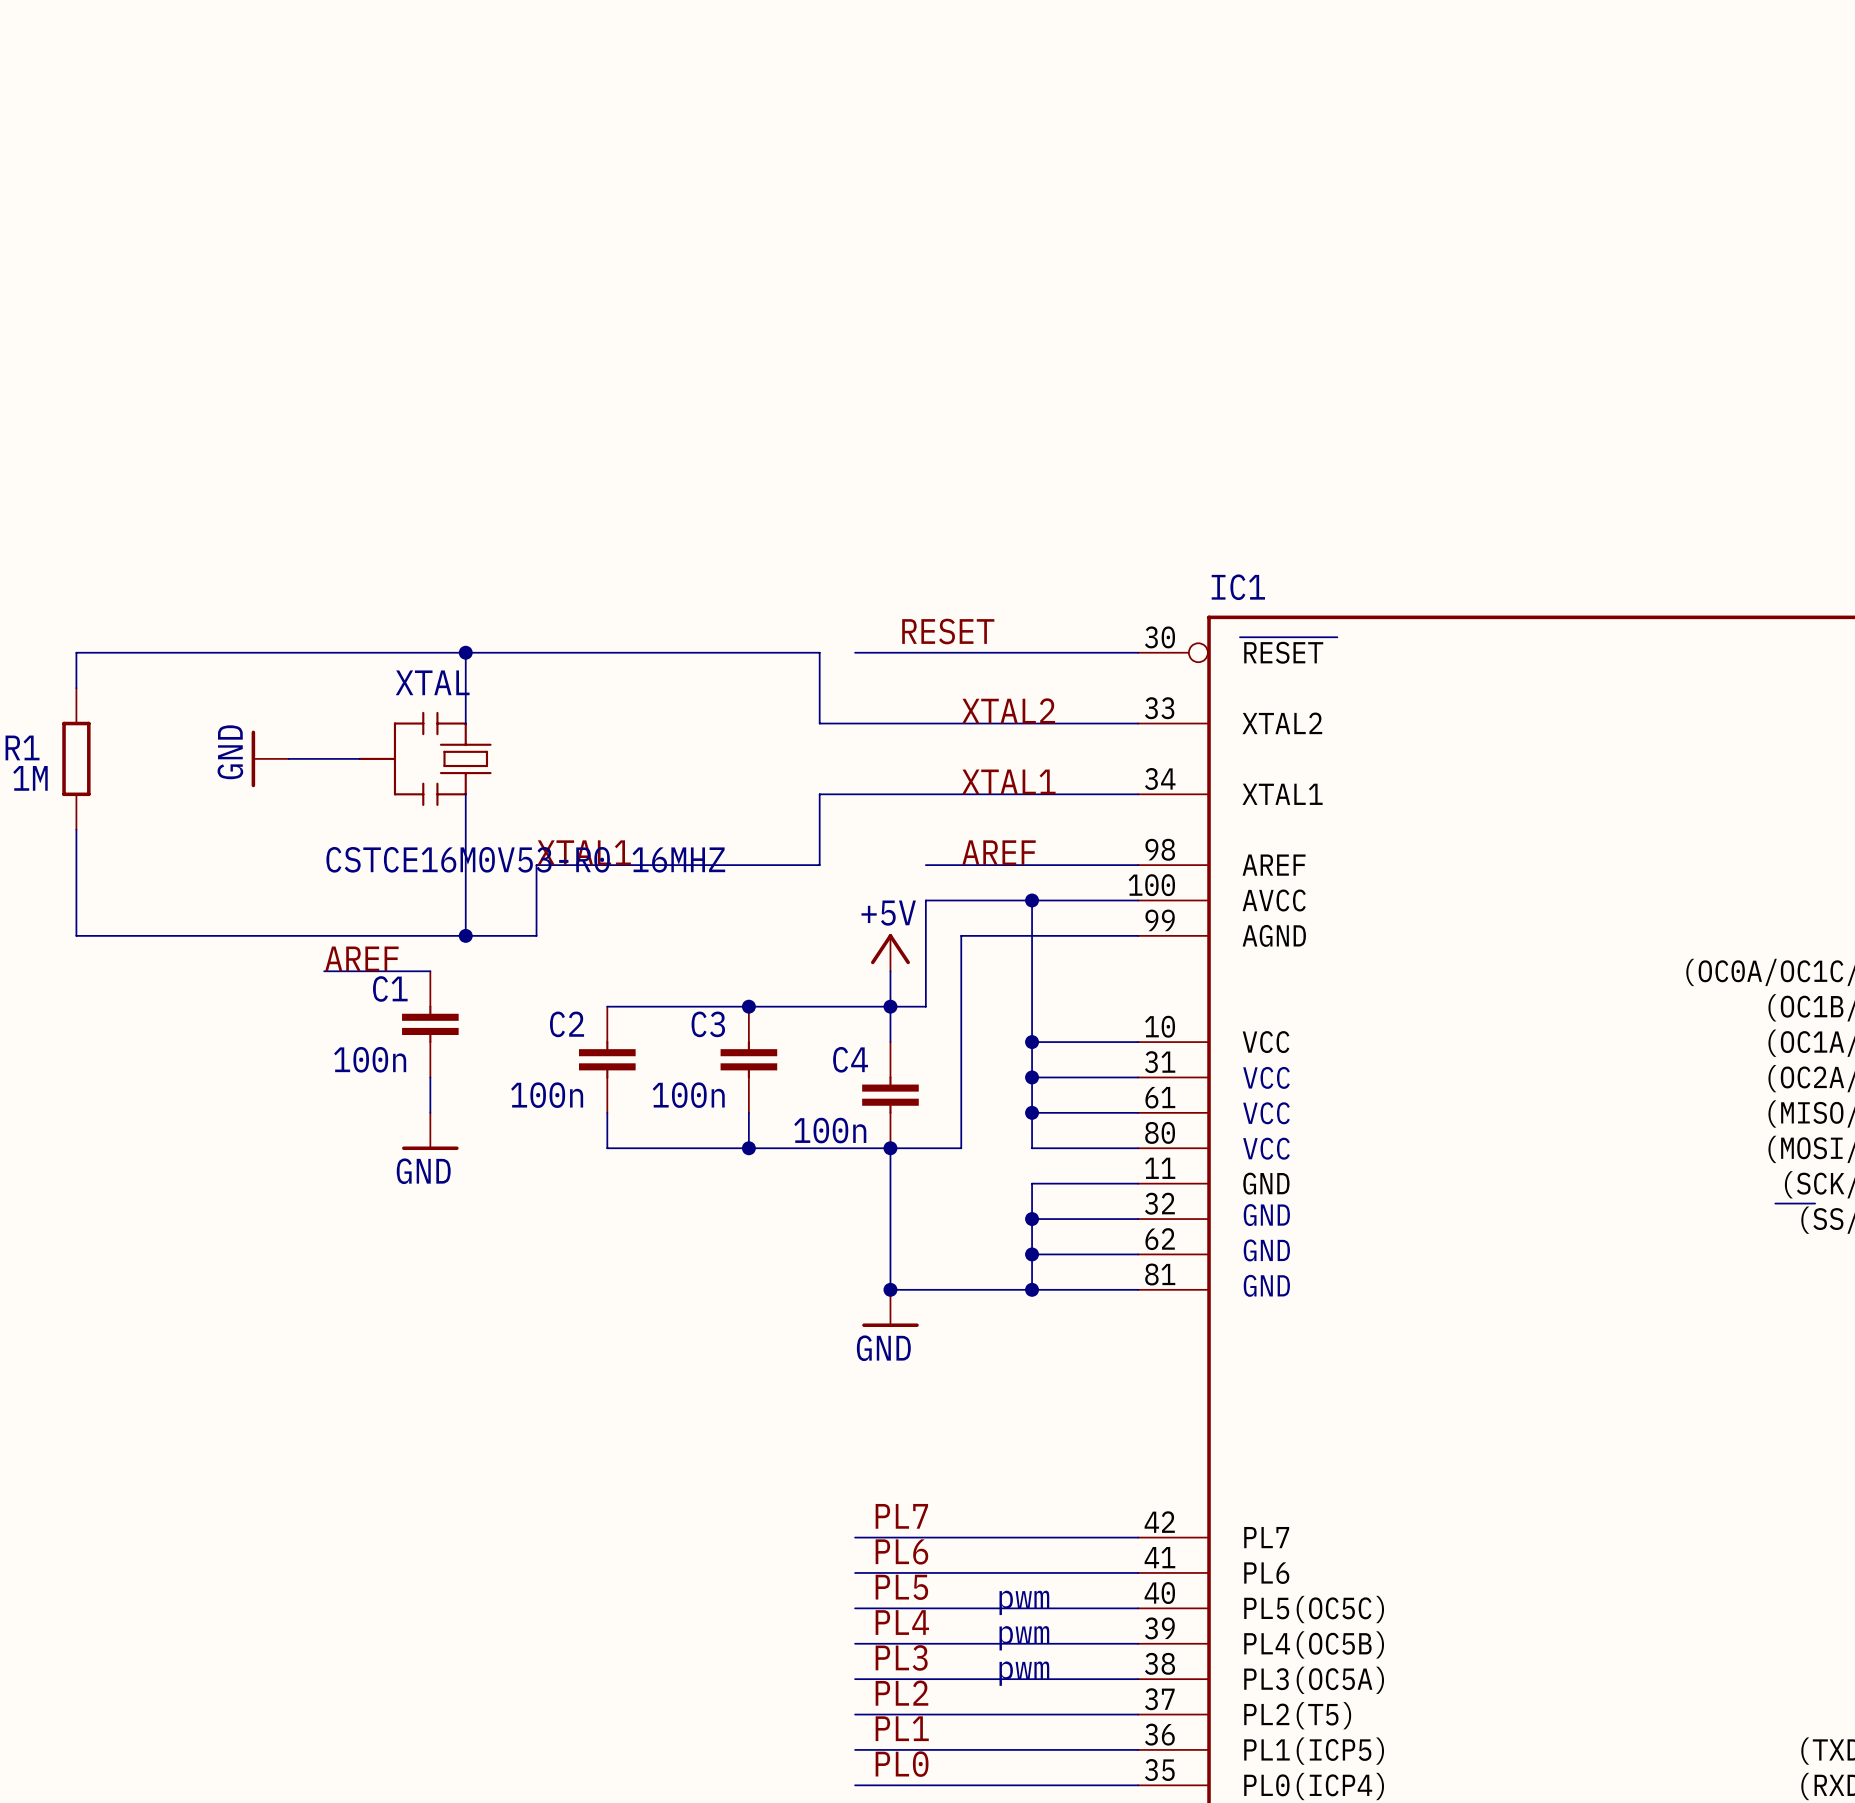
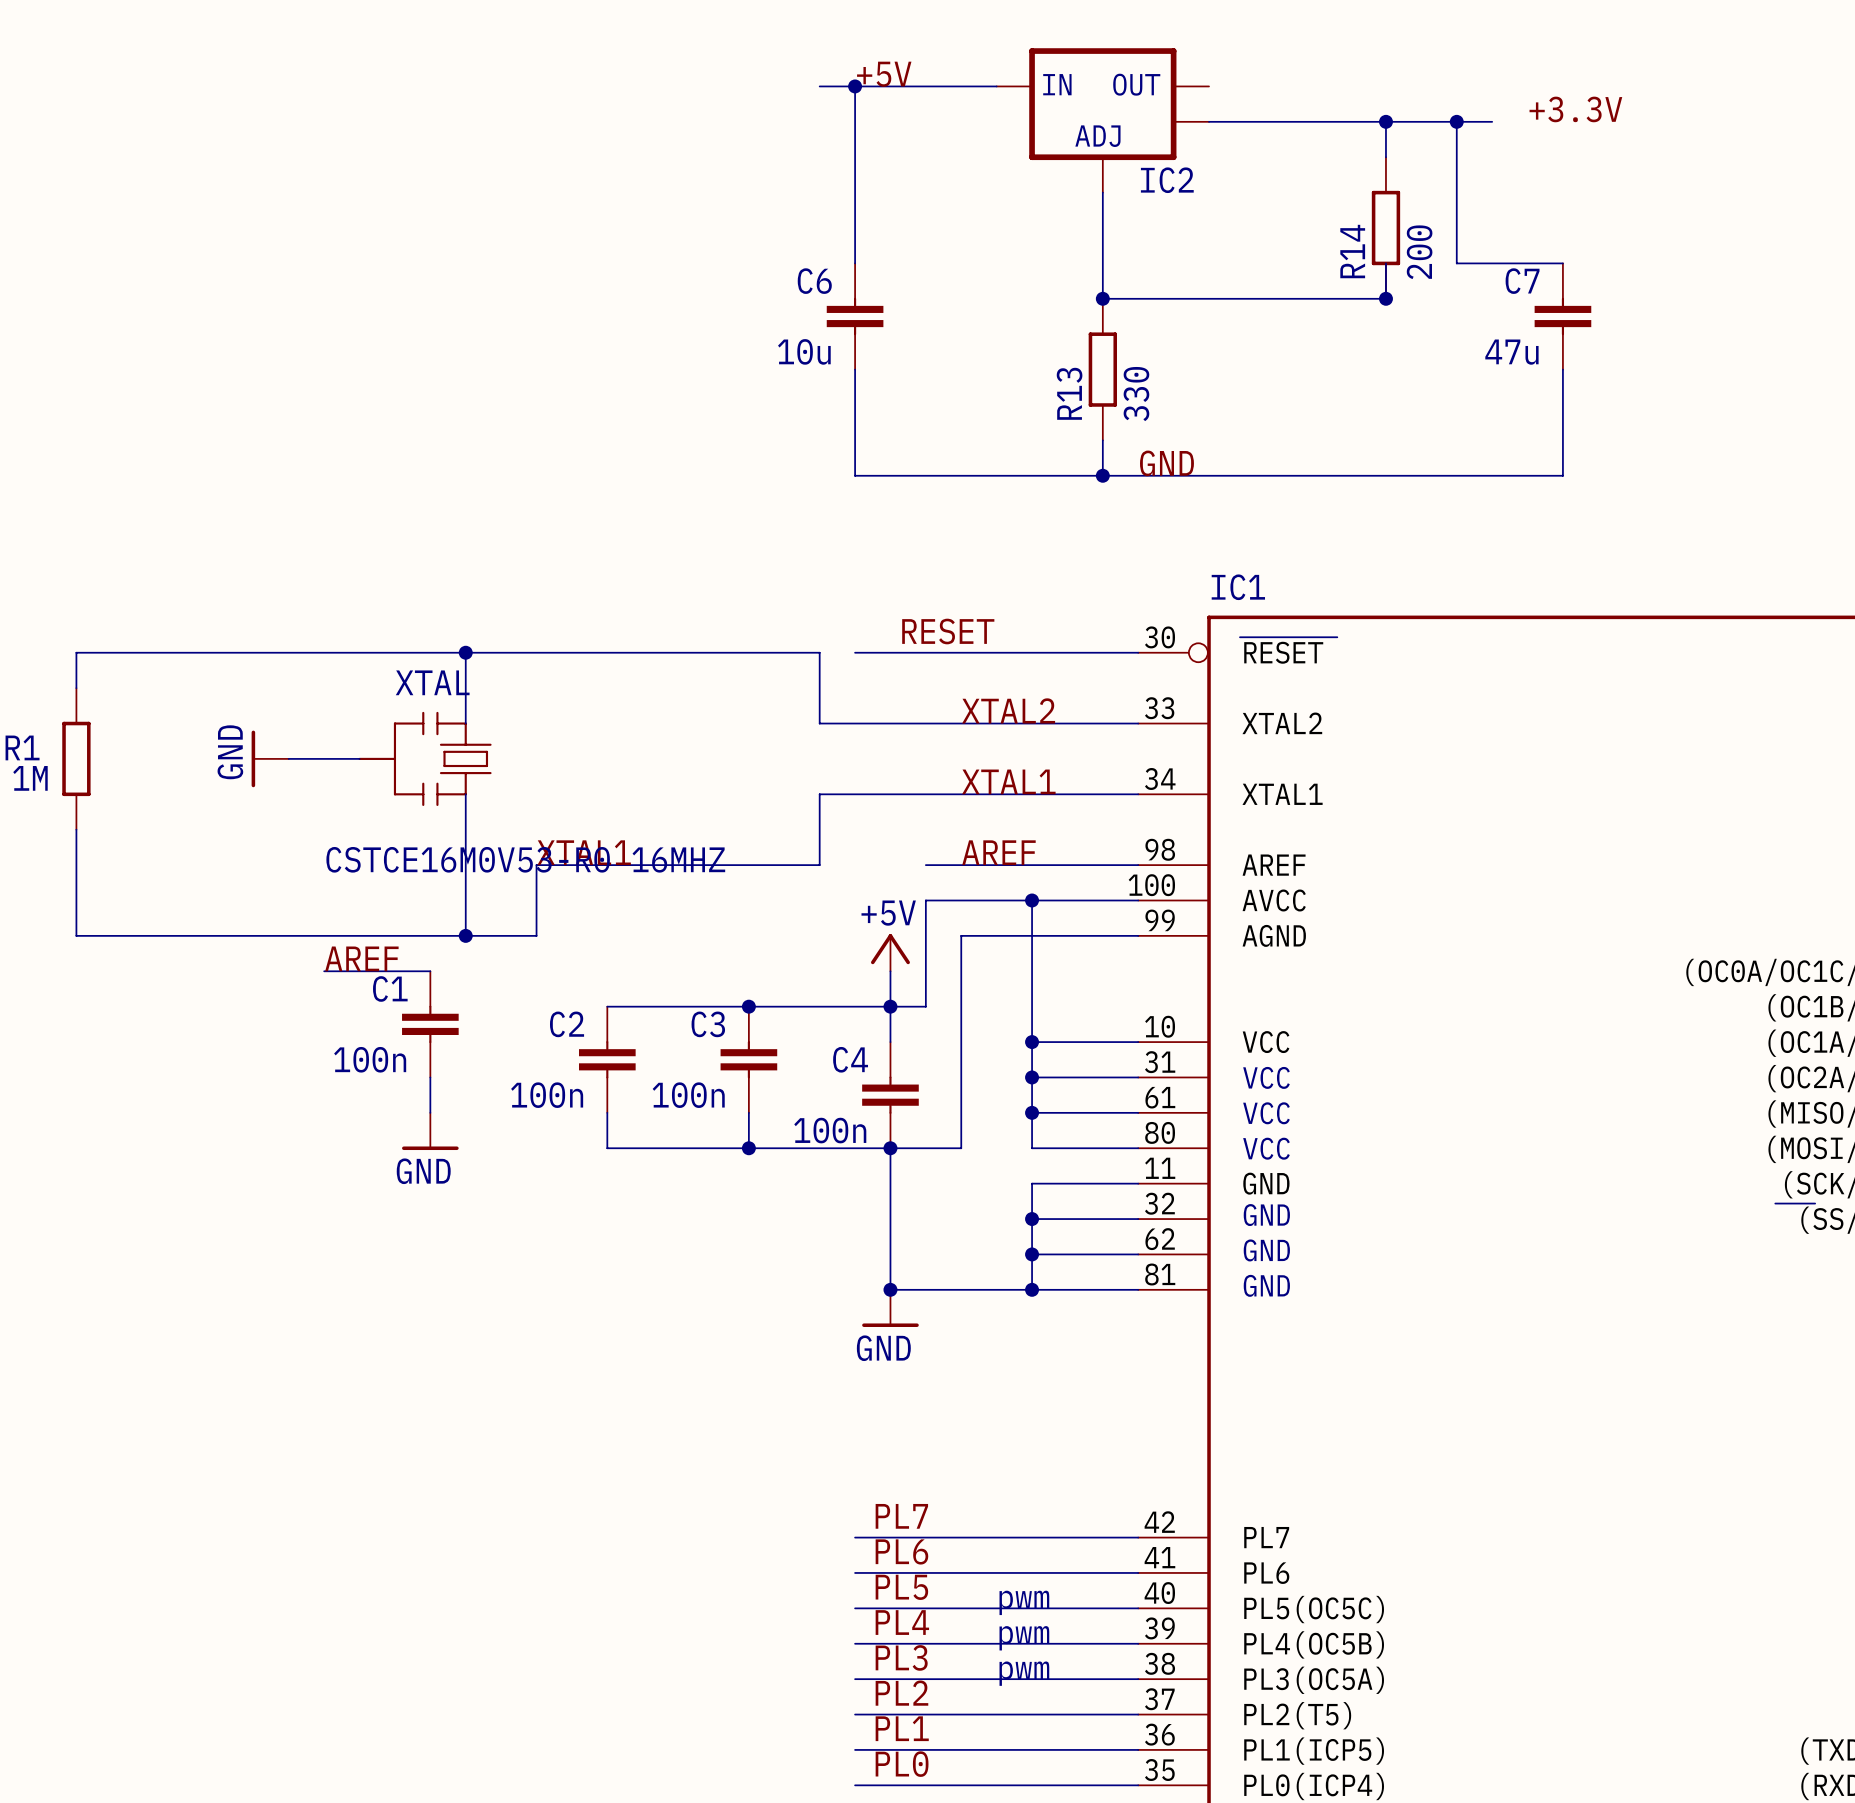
label: none -> +5V (884, 74)
wire: none -> (819, 86) (996, 86)
wire: none -> (855, 86) (855, 263)
junction: none -> (855, 86)
label: none -> +3.3V (1575, 109)
IC2: none -> (1102, 120)
wire: none -> (1209, 121) (1492, 121)
wire: none -> (1385, 121) (1385, 157)
junction: none -> (1385, 121)
wire: none -> (1456, 121) (1456, 263) (1562, 263)
junction: none -> (1456, 121)
wire: none -> (1102, 192) (1102, 298) (1385, 298) (1385, 263)
R14: none -> 200 (1385, 228)
junction: none -> (1102, 298)
junction: none -> (1385, 298)
C6: none -> 10u (855, 316)
C7: none -> 47u (1562, 316)
wire: none -> (855, 369) (855, 475) (1562, 475) (1562, 369)
R13: none -> 330 (1102, 369)
wire: none -> (1102, 440) (1102, 475)
label: none -> GND (1166, 463)
junction: none -> (1102, 475)

